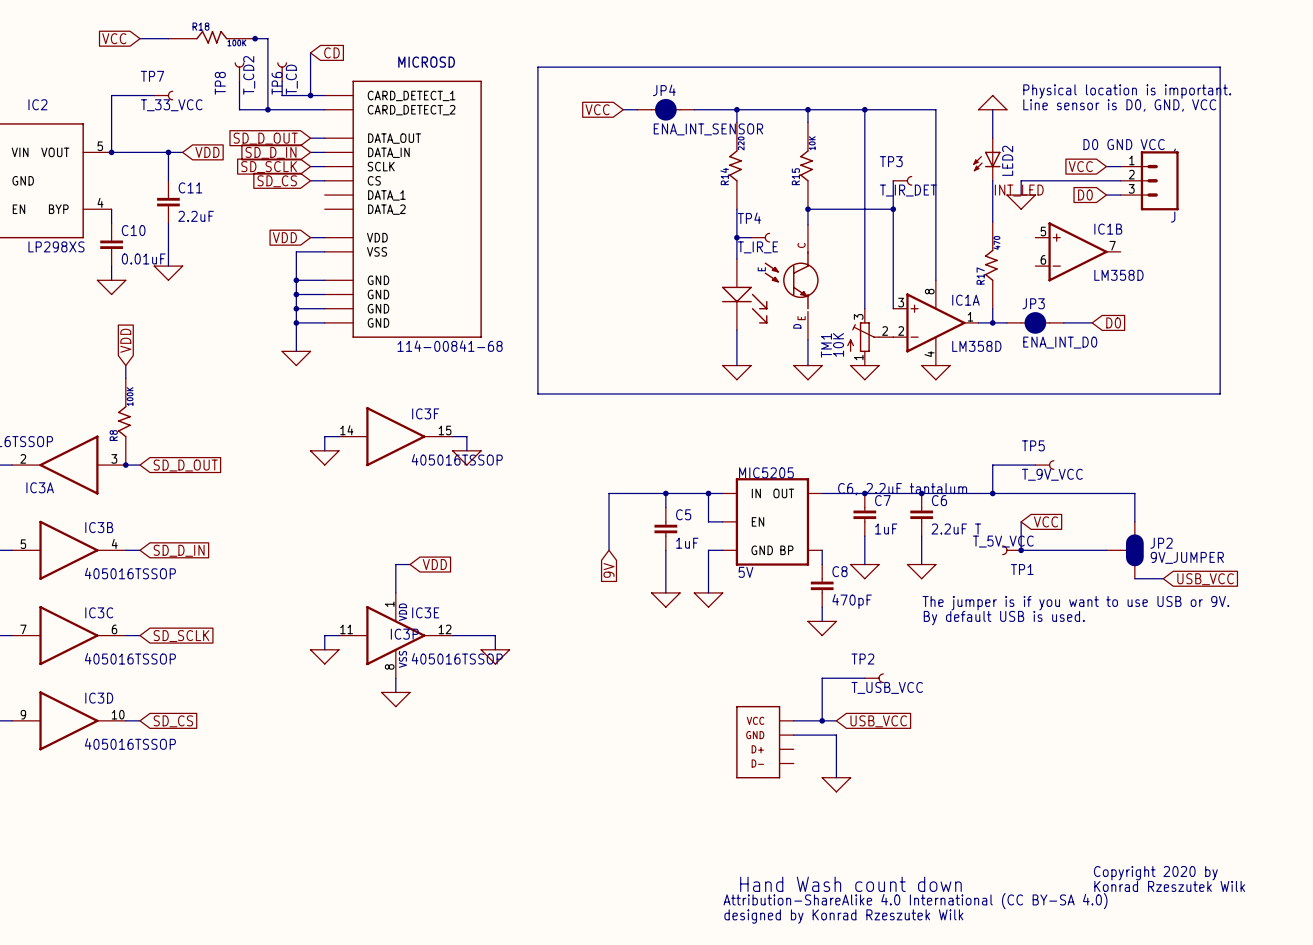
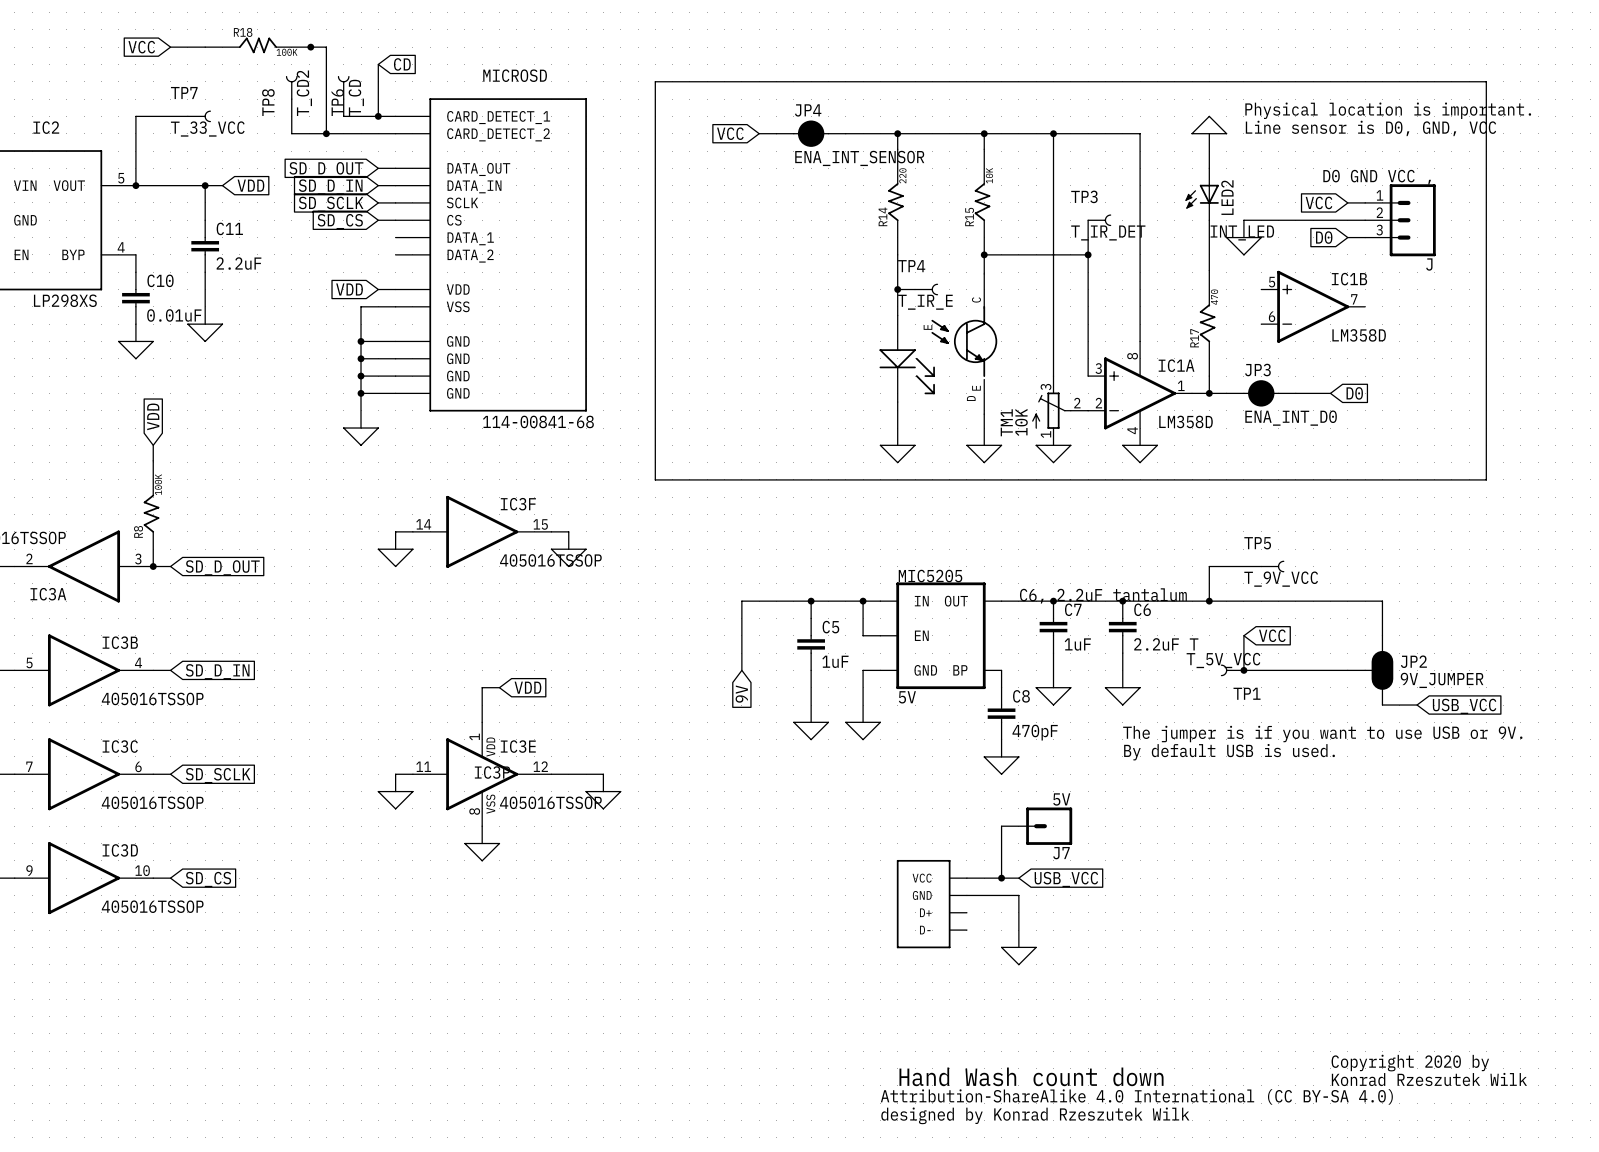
J7: none -> 5V (1036, 826)
TP2: T_USB_VCC (874, 678) -> none

